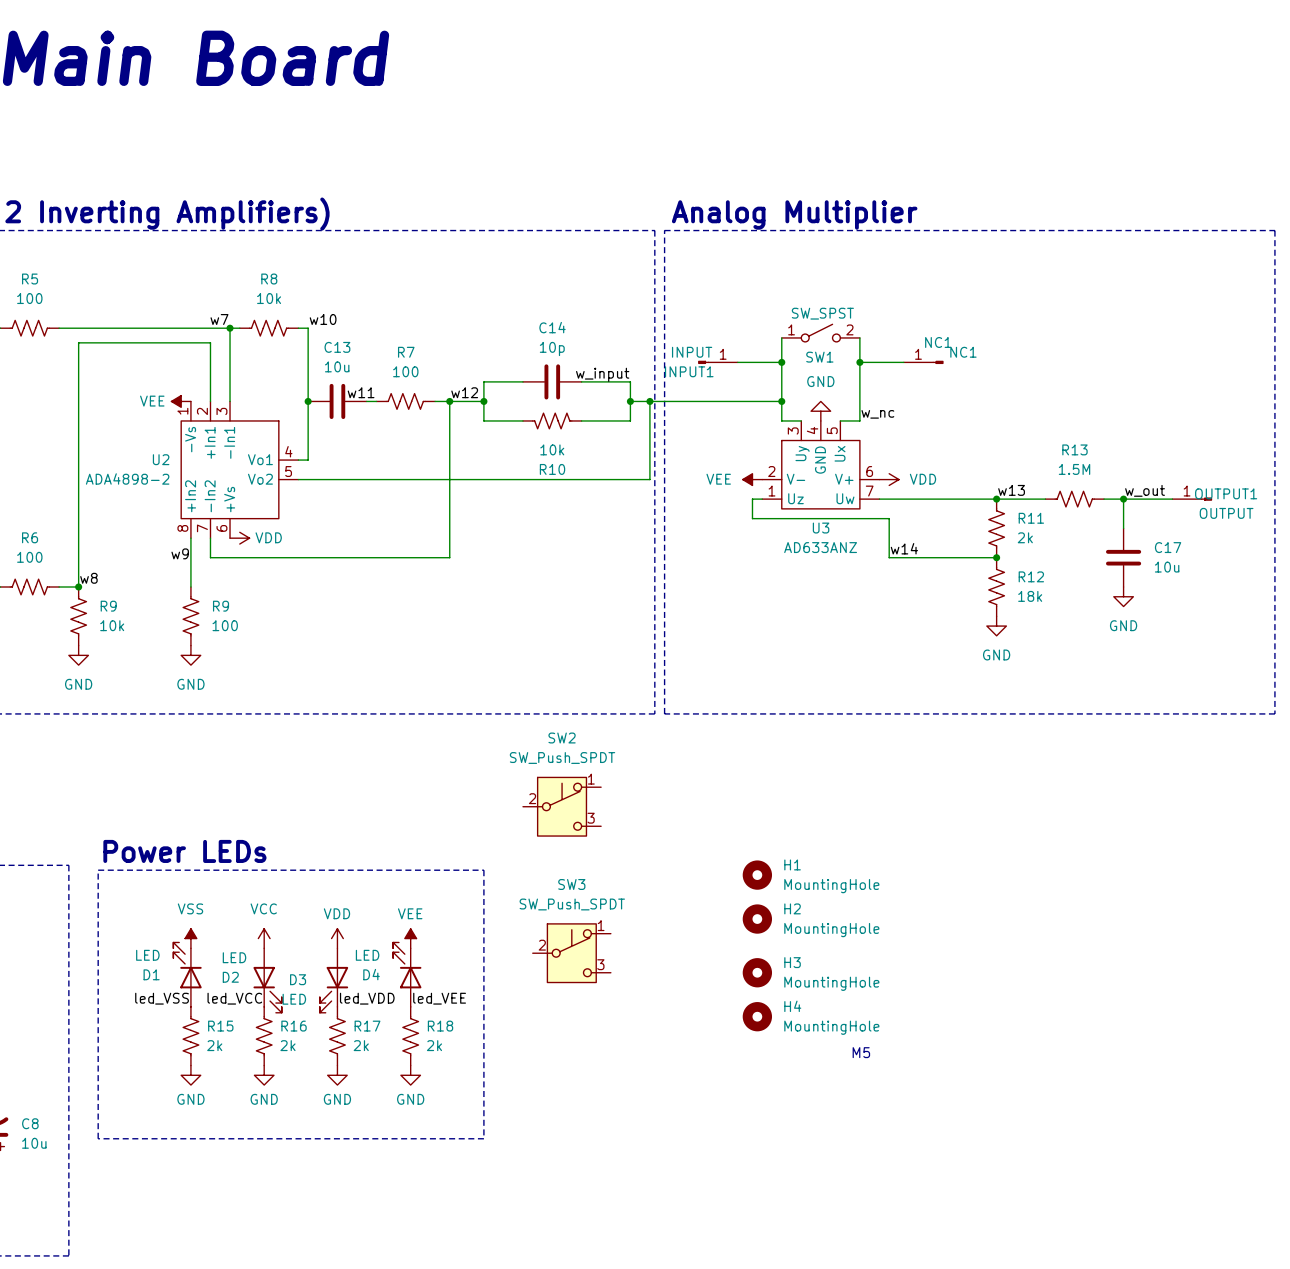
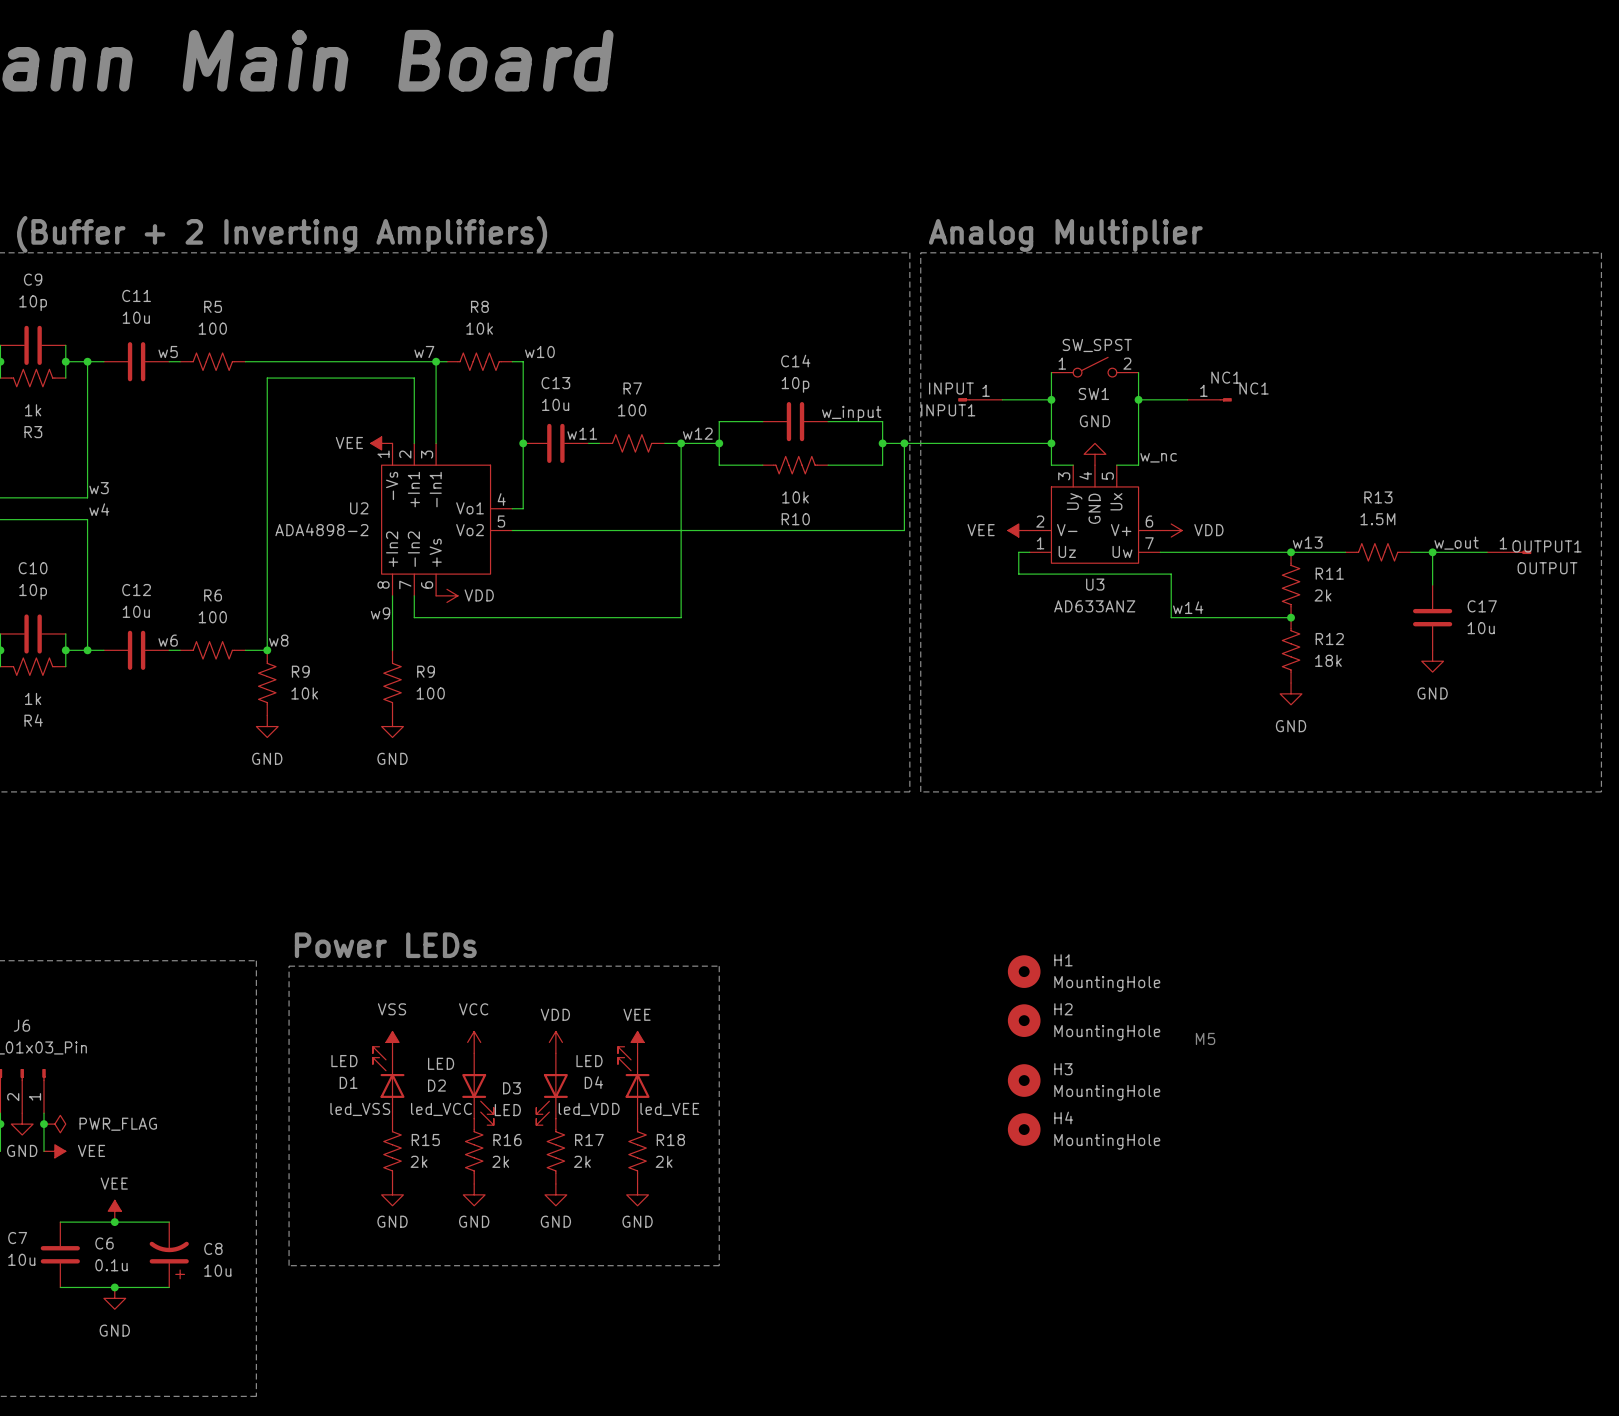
SW2: SW_Push_SPDT (562, 806) -> none
SW3: SW_Push_SPDT (571, 953) -> none
text position: M5 (861, 1052) -> M5 (1205, 1038)

